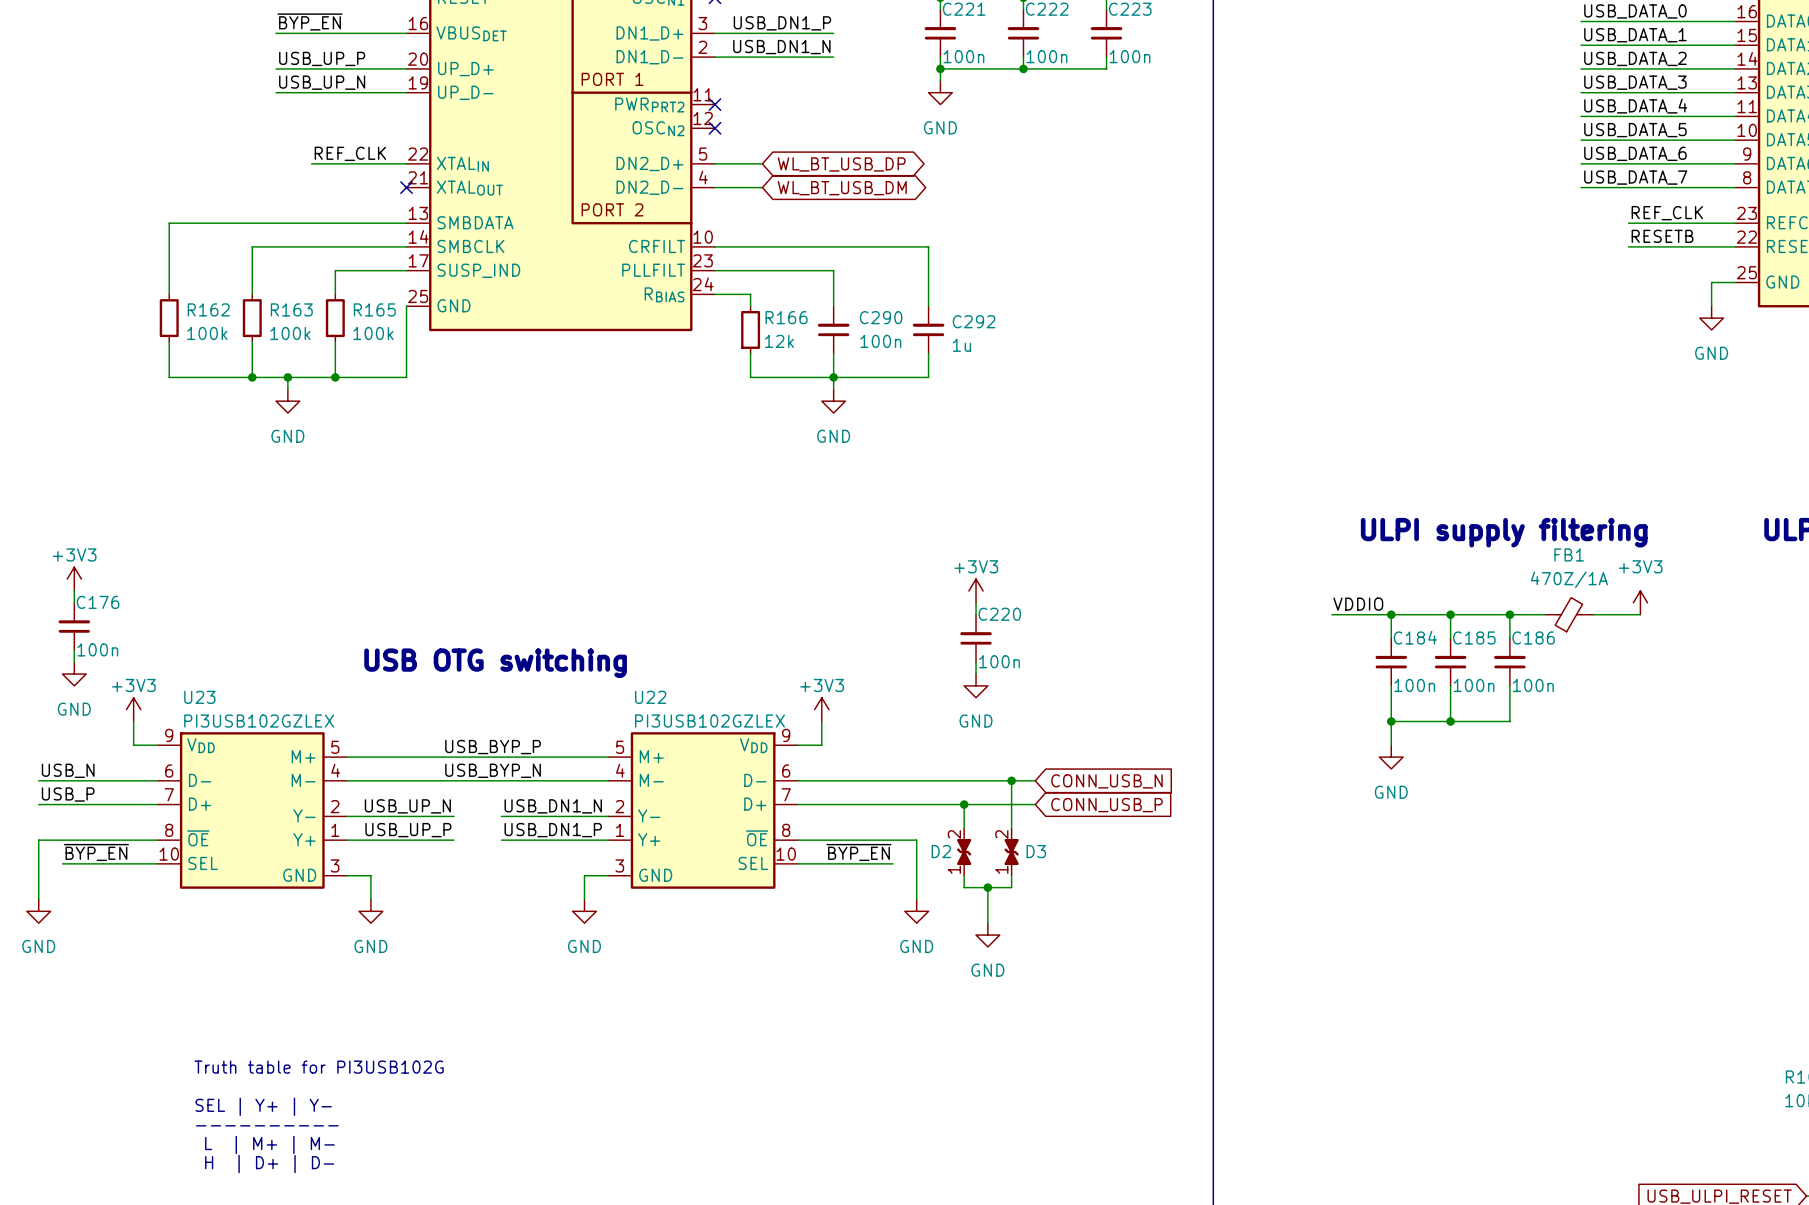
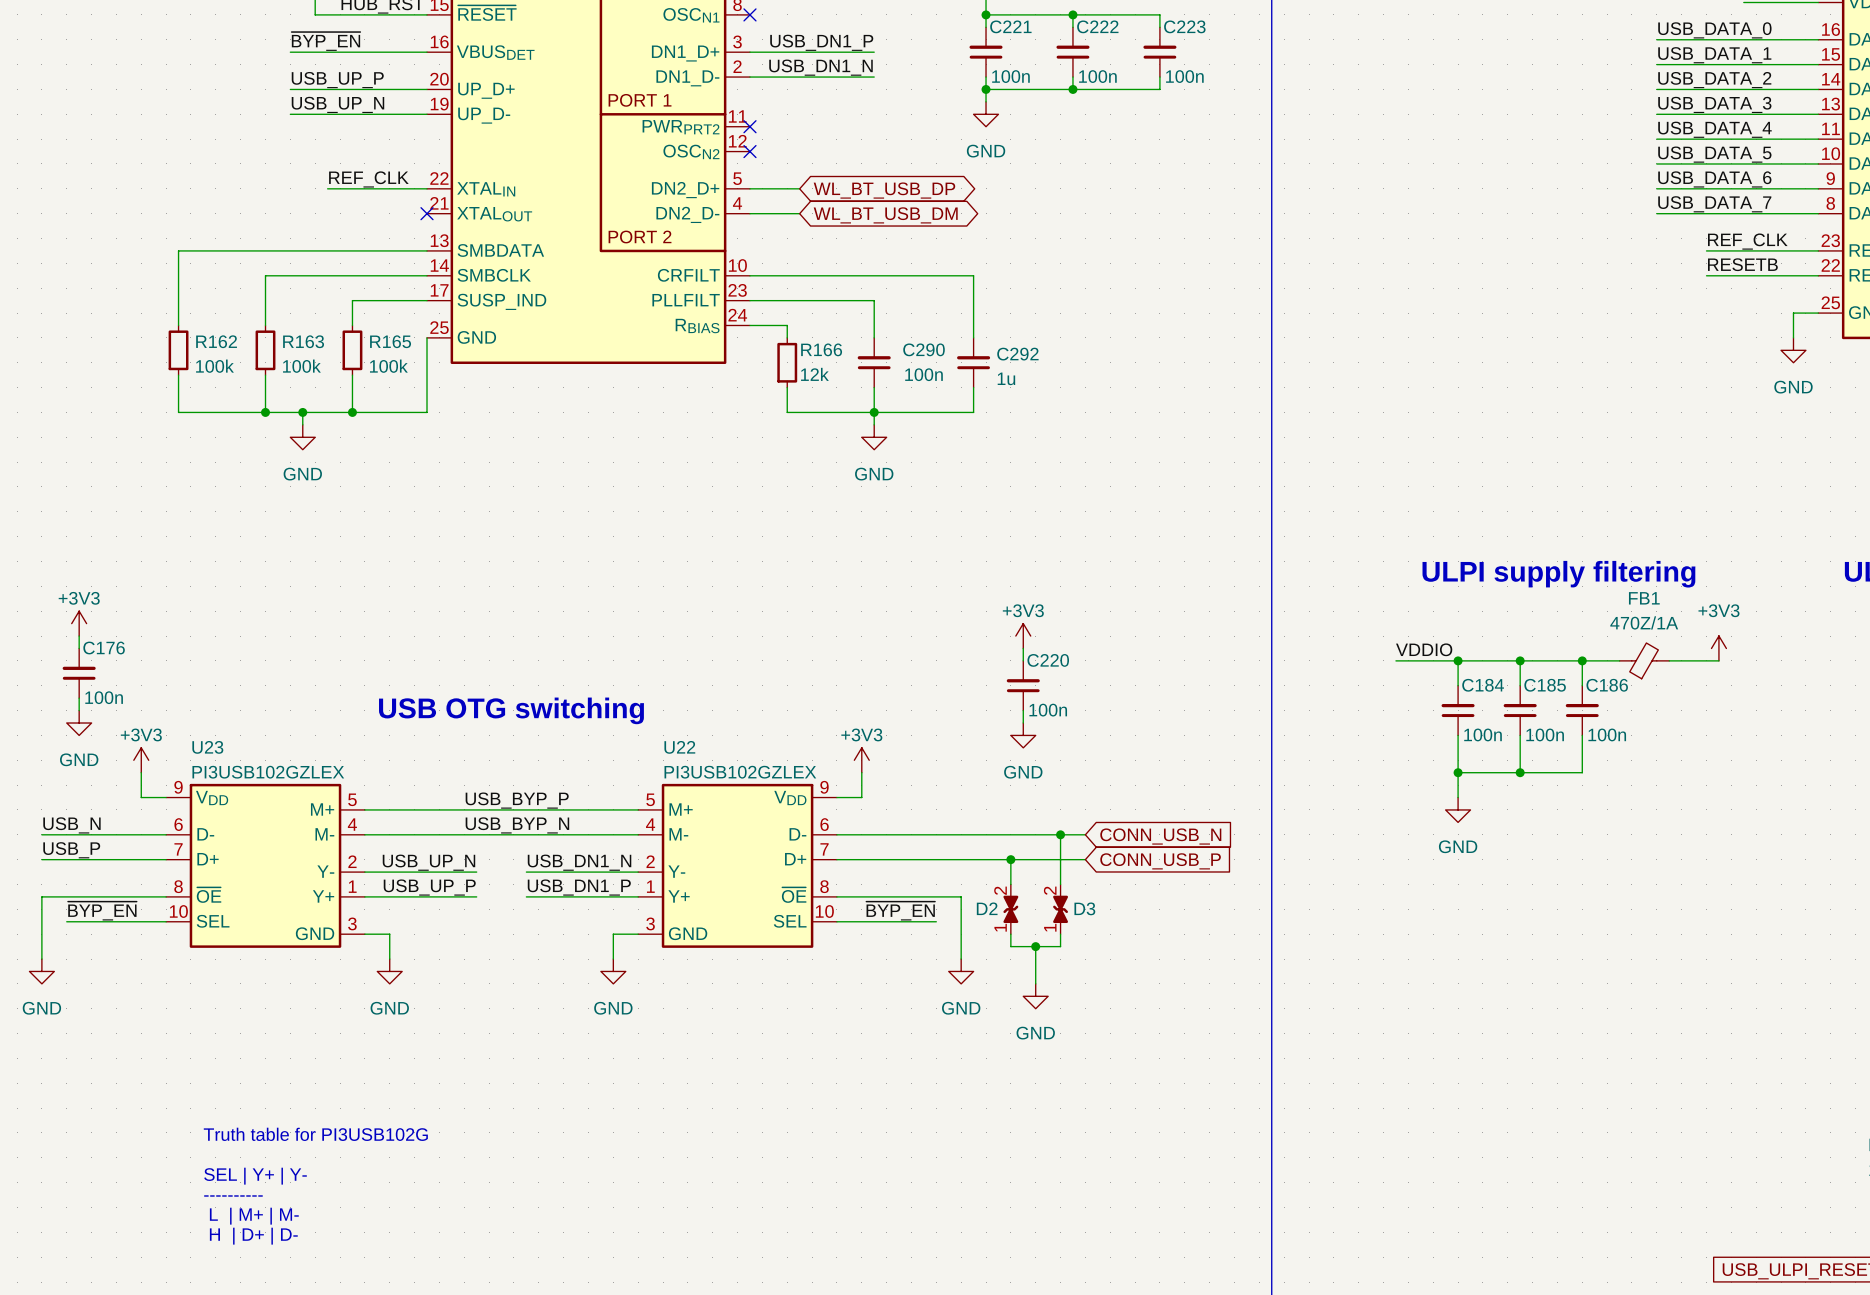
D2 flip: as is (964, 852) -> left-right (1010, 909)

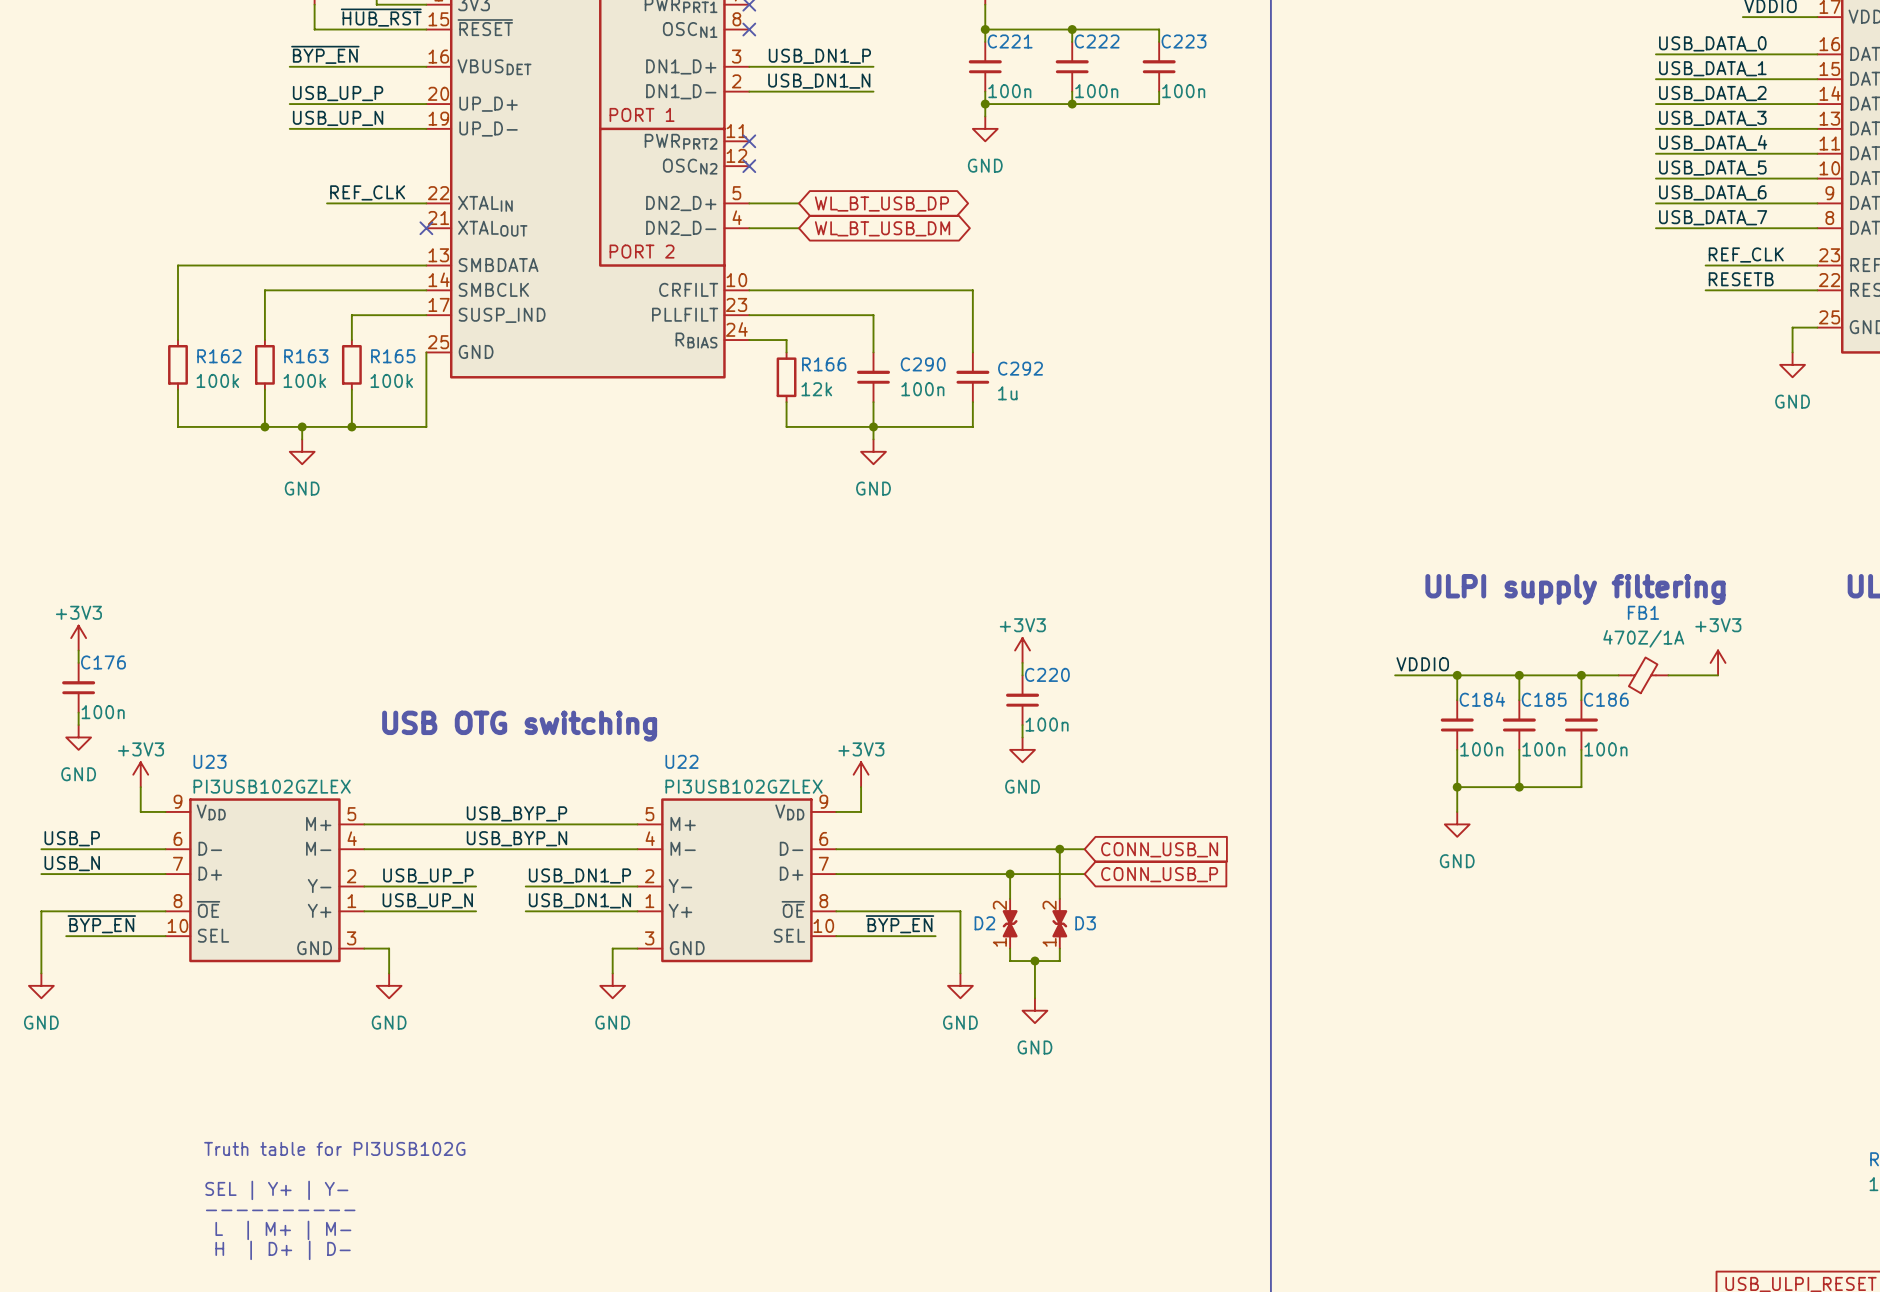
label: USB_N (71, 825) -> USB_P (72, 838)
label: USB_P (71, 850) -> USB_N (72, 863)
label: USB_UP_N (428, 862) -> USB_UP_P (428, 876)
label: USB_DN1_N (579, 862) -> USB_DN1_P (579, 876)
label: USB_UP_P (429, 887) -> USB_UP_N (427, 900)
label: USB_DN1_P (579, 887) -> USB_DN1_N (579, 900)

